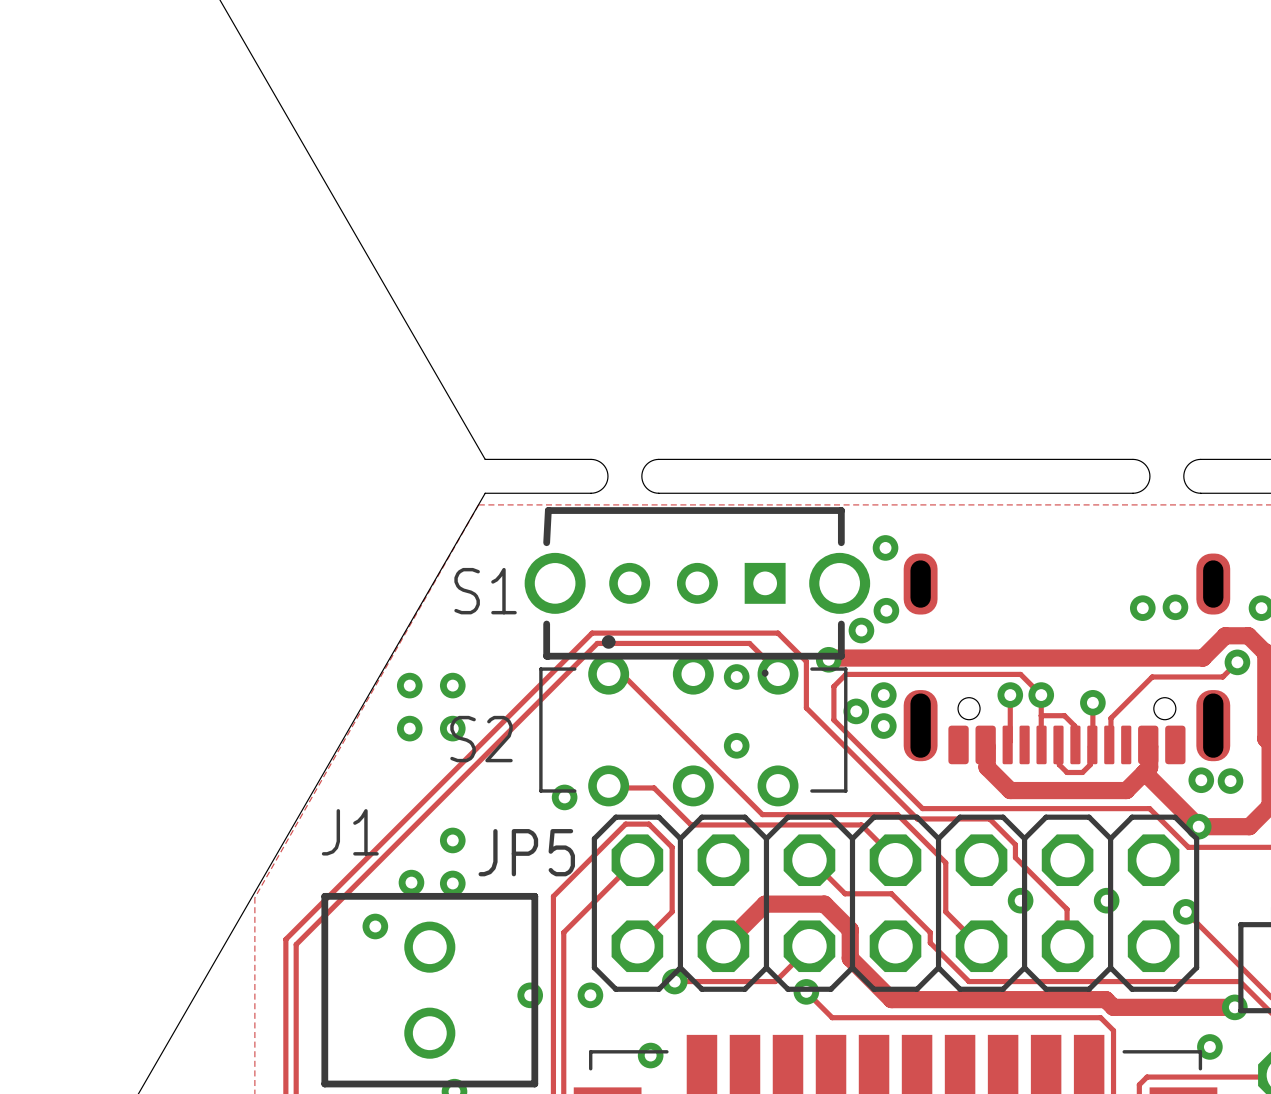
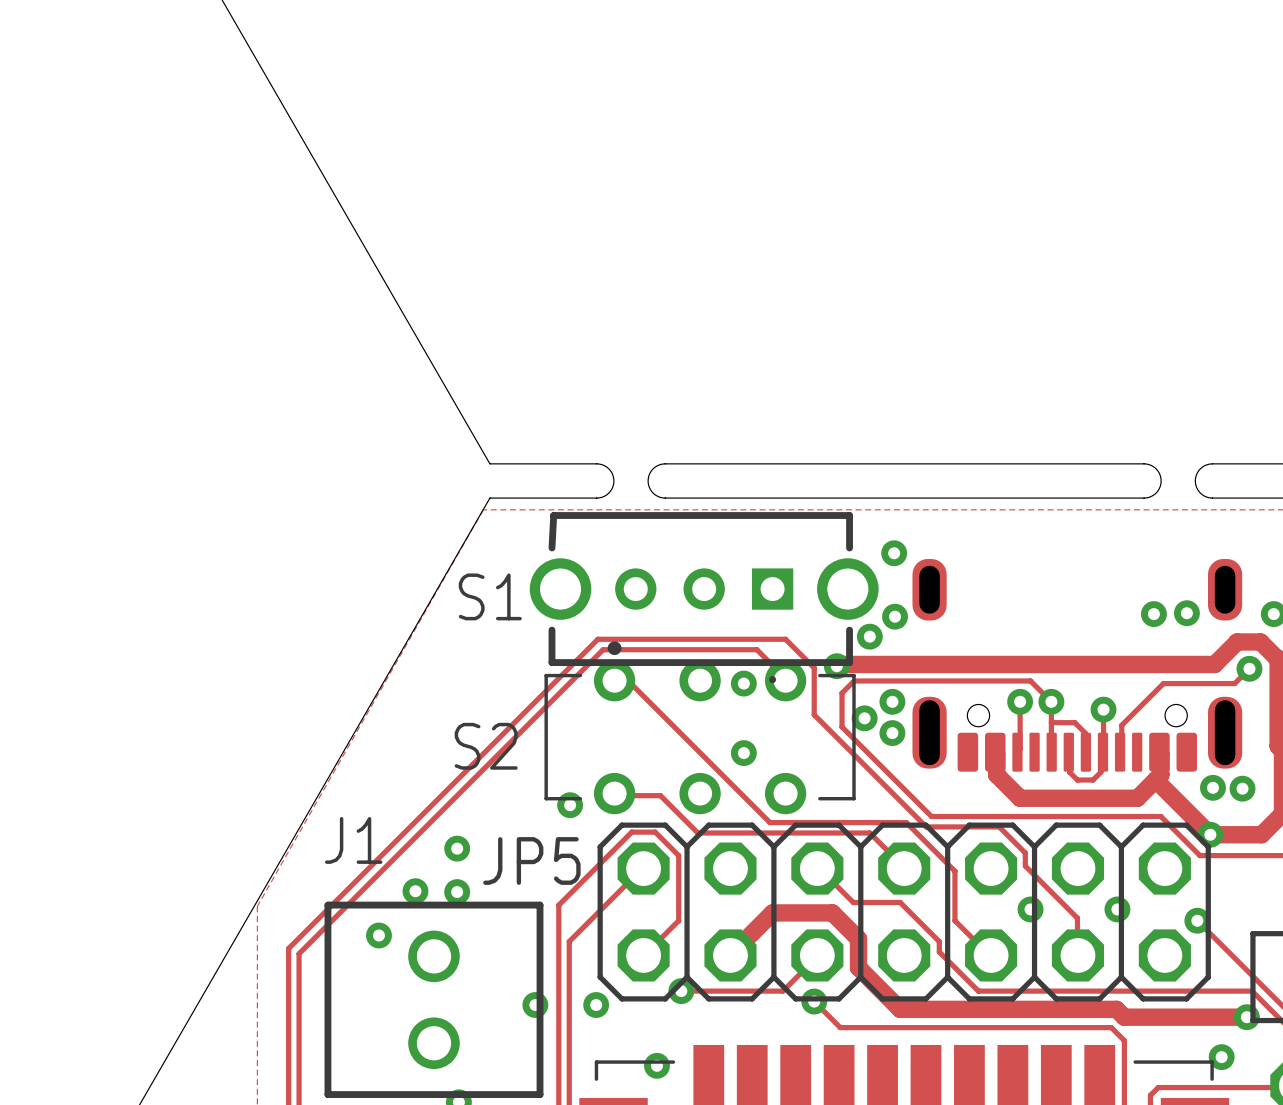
via: (409, 685) -> none
via: (452, 685) -> none
via: (409, 728) -> none
via: (452, 728) -> none

